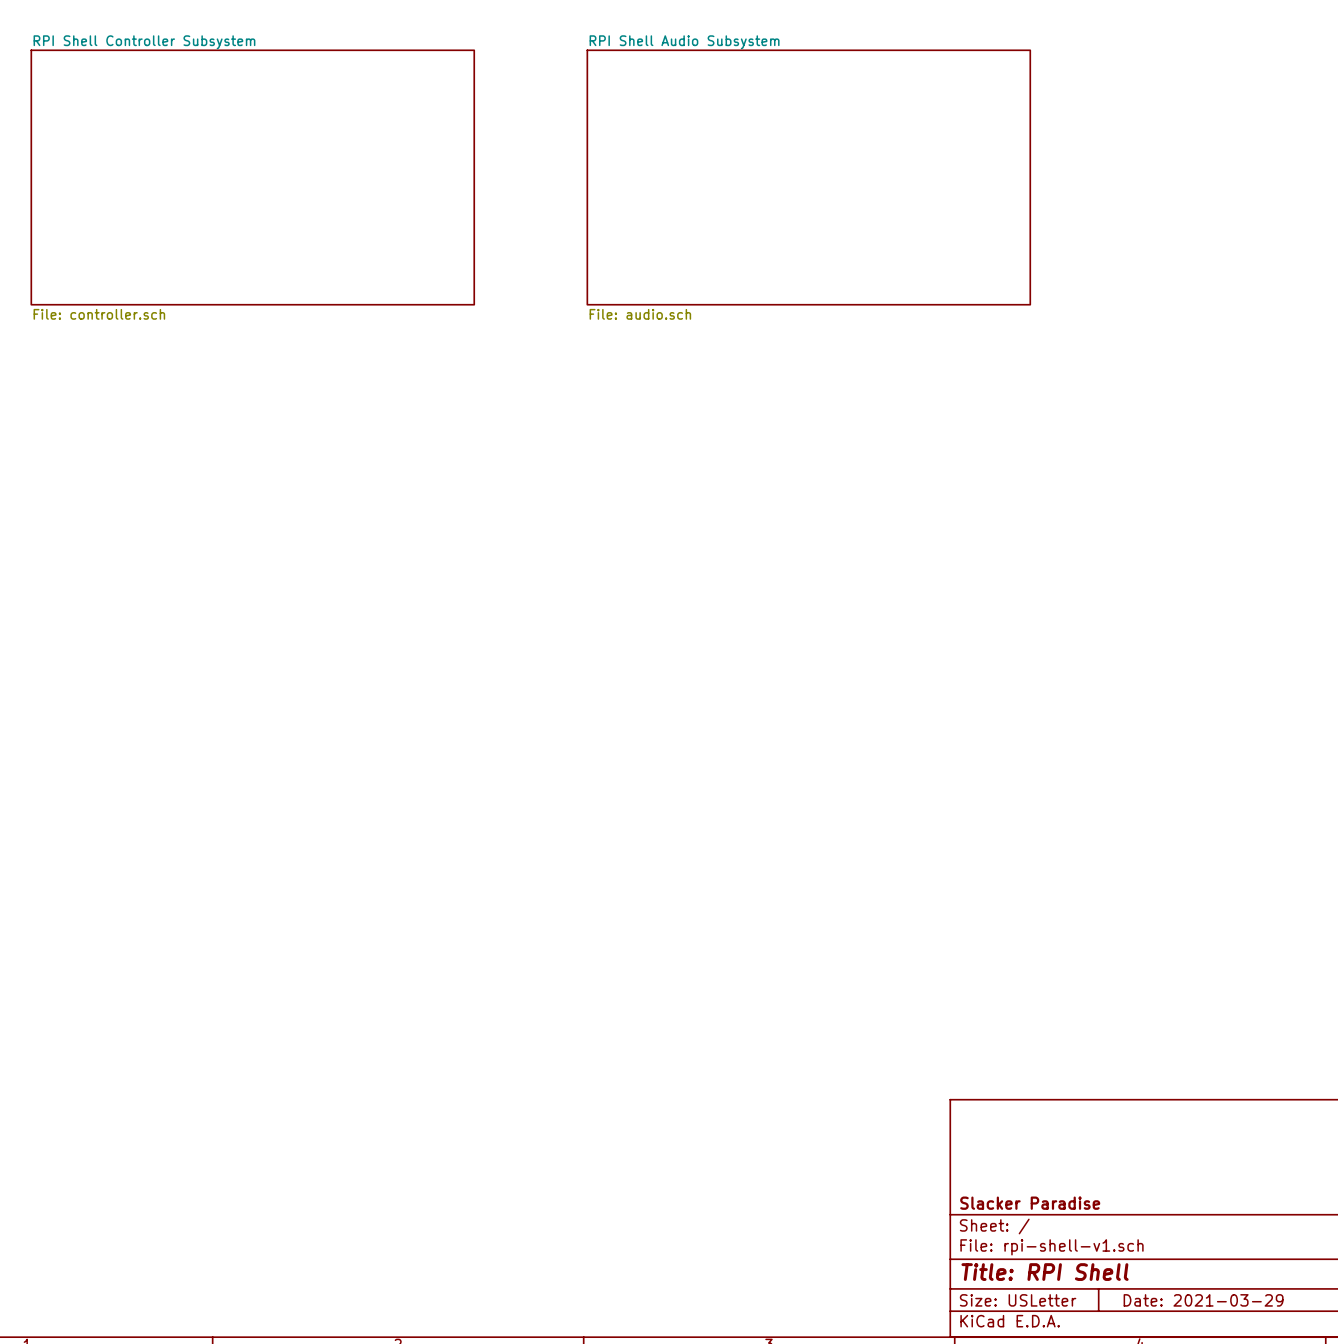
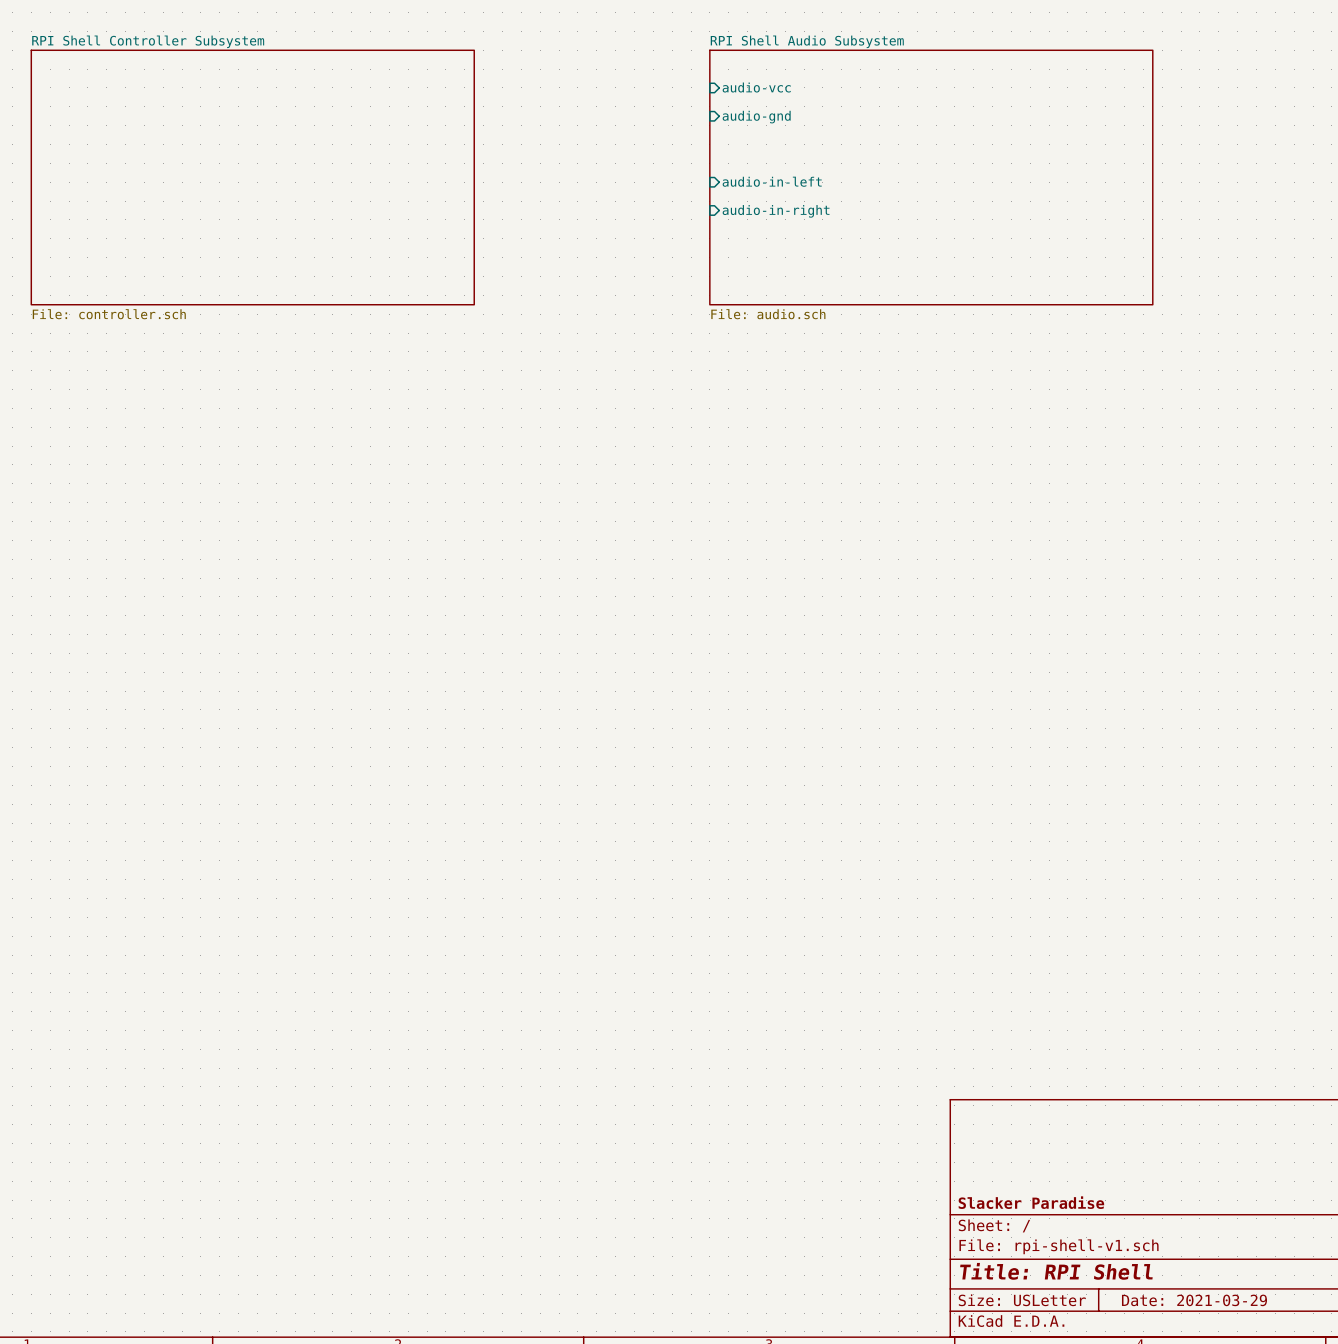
sheet pin: none -> audio-vcc (756, 87)
sheet pin: none -> audio-gnd (756, 117)
sheet RPI Shell Audio Subsystem position: (808, 177) -> (931, 177)
sheet pin: none -> audio-in-left (772, 181)
sheet pin: none -> audio-in-right (776, 211)

